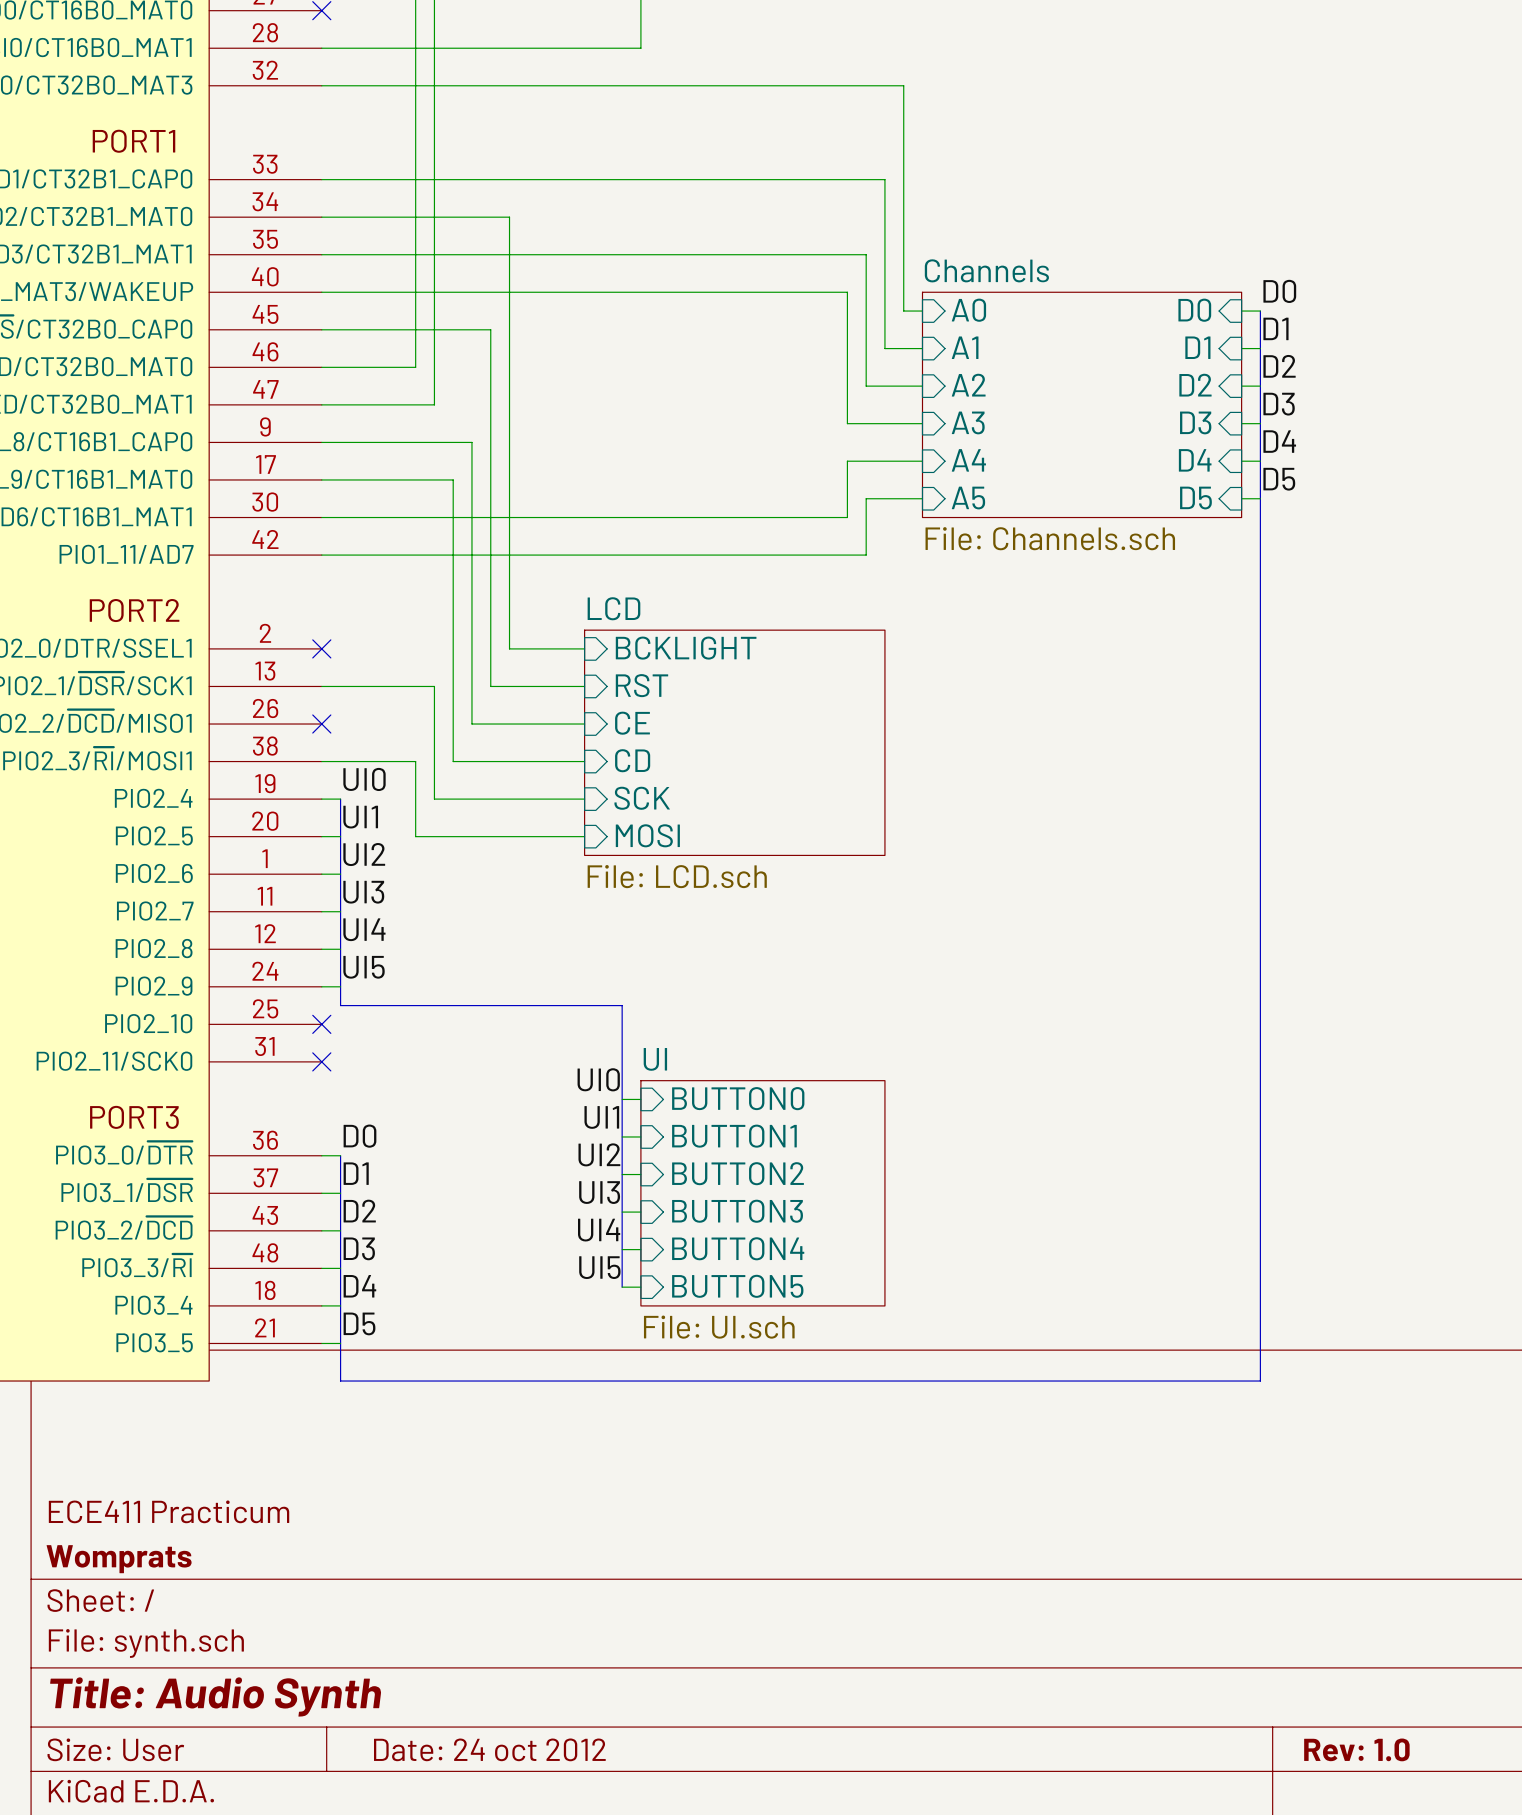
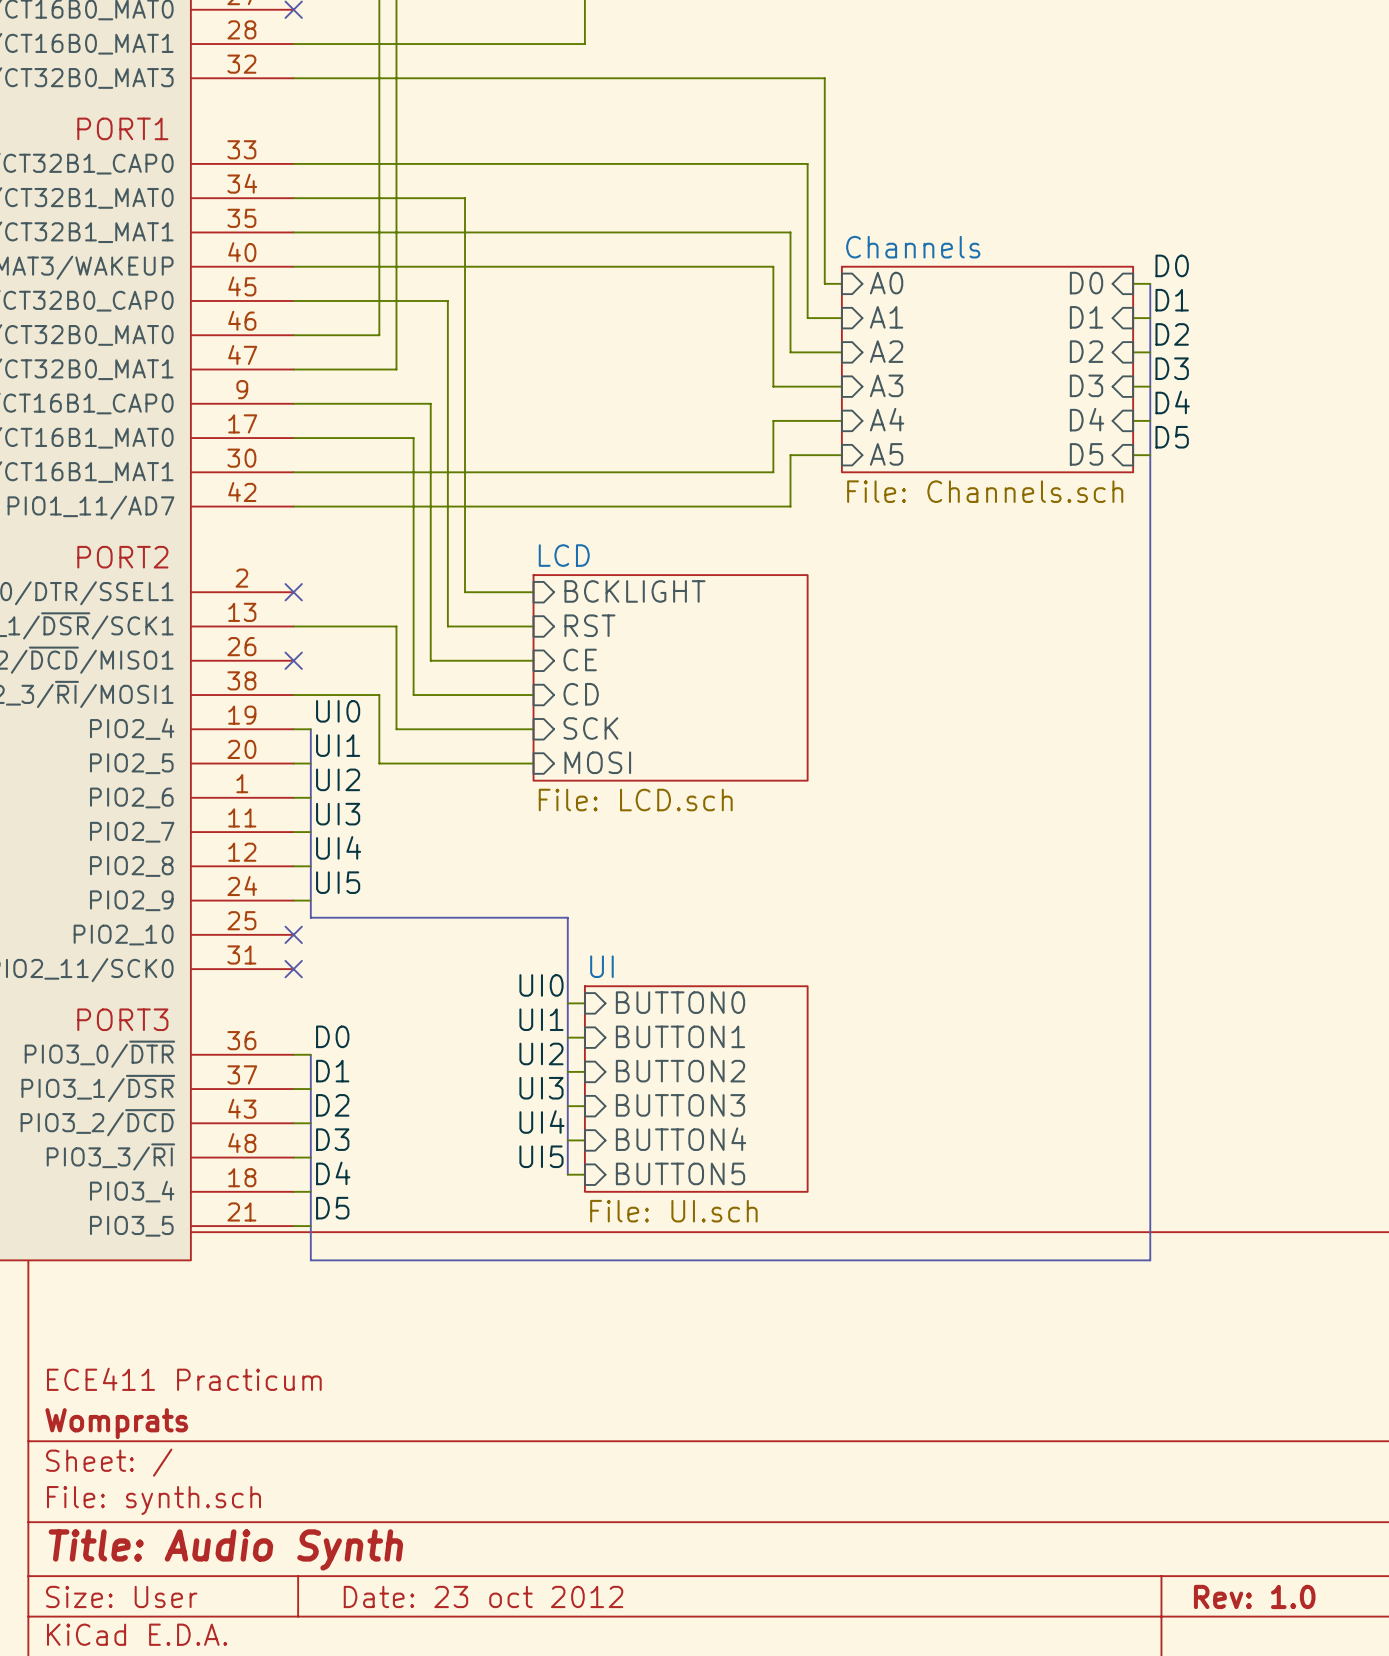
title block: Date: 24 oct 2012 (489, 1749) -> Date: 23 oct 2012 (483, 1596)

